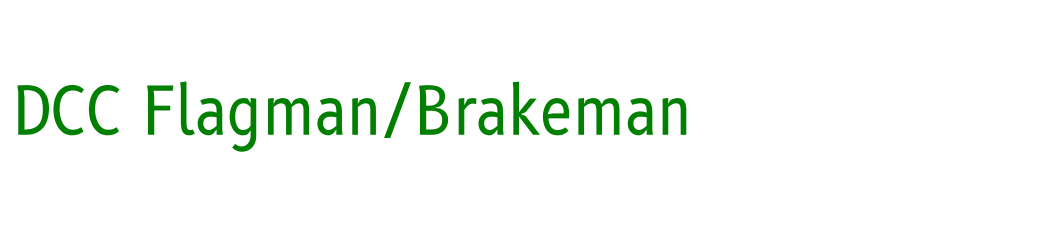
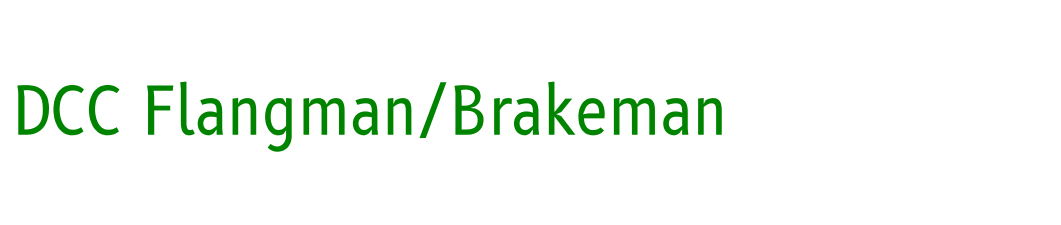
text: DCC Flagman/Brakeman (351, 116) -> DCC Flangman/Brakeman (369, 116)

